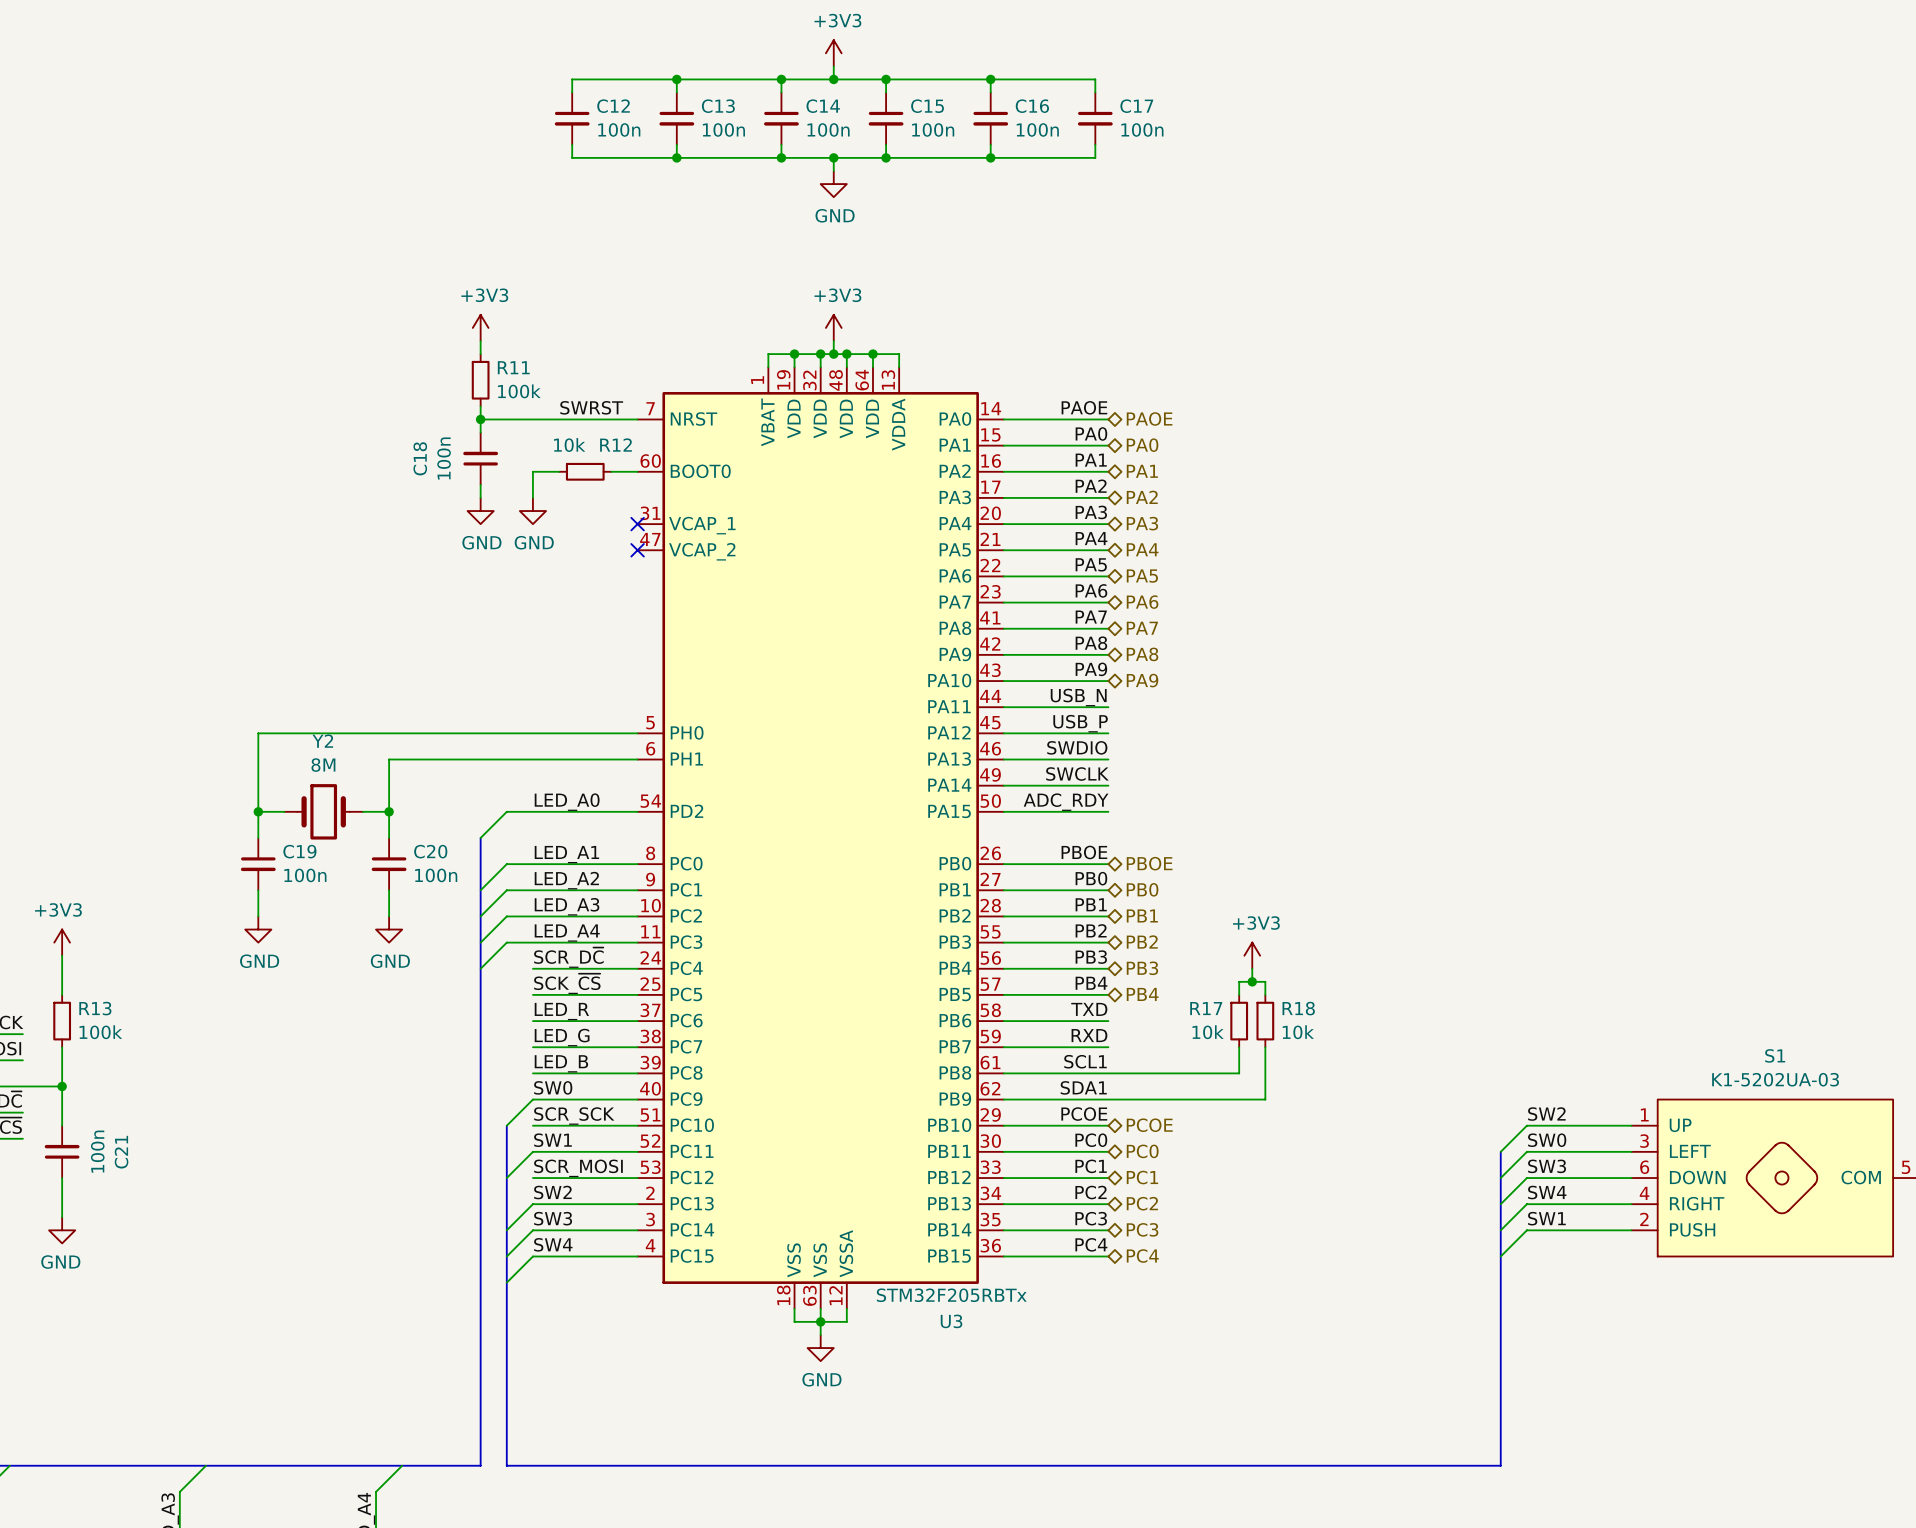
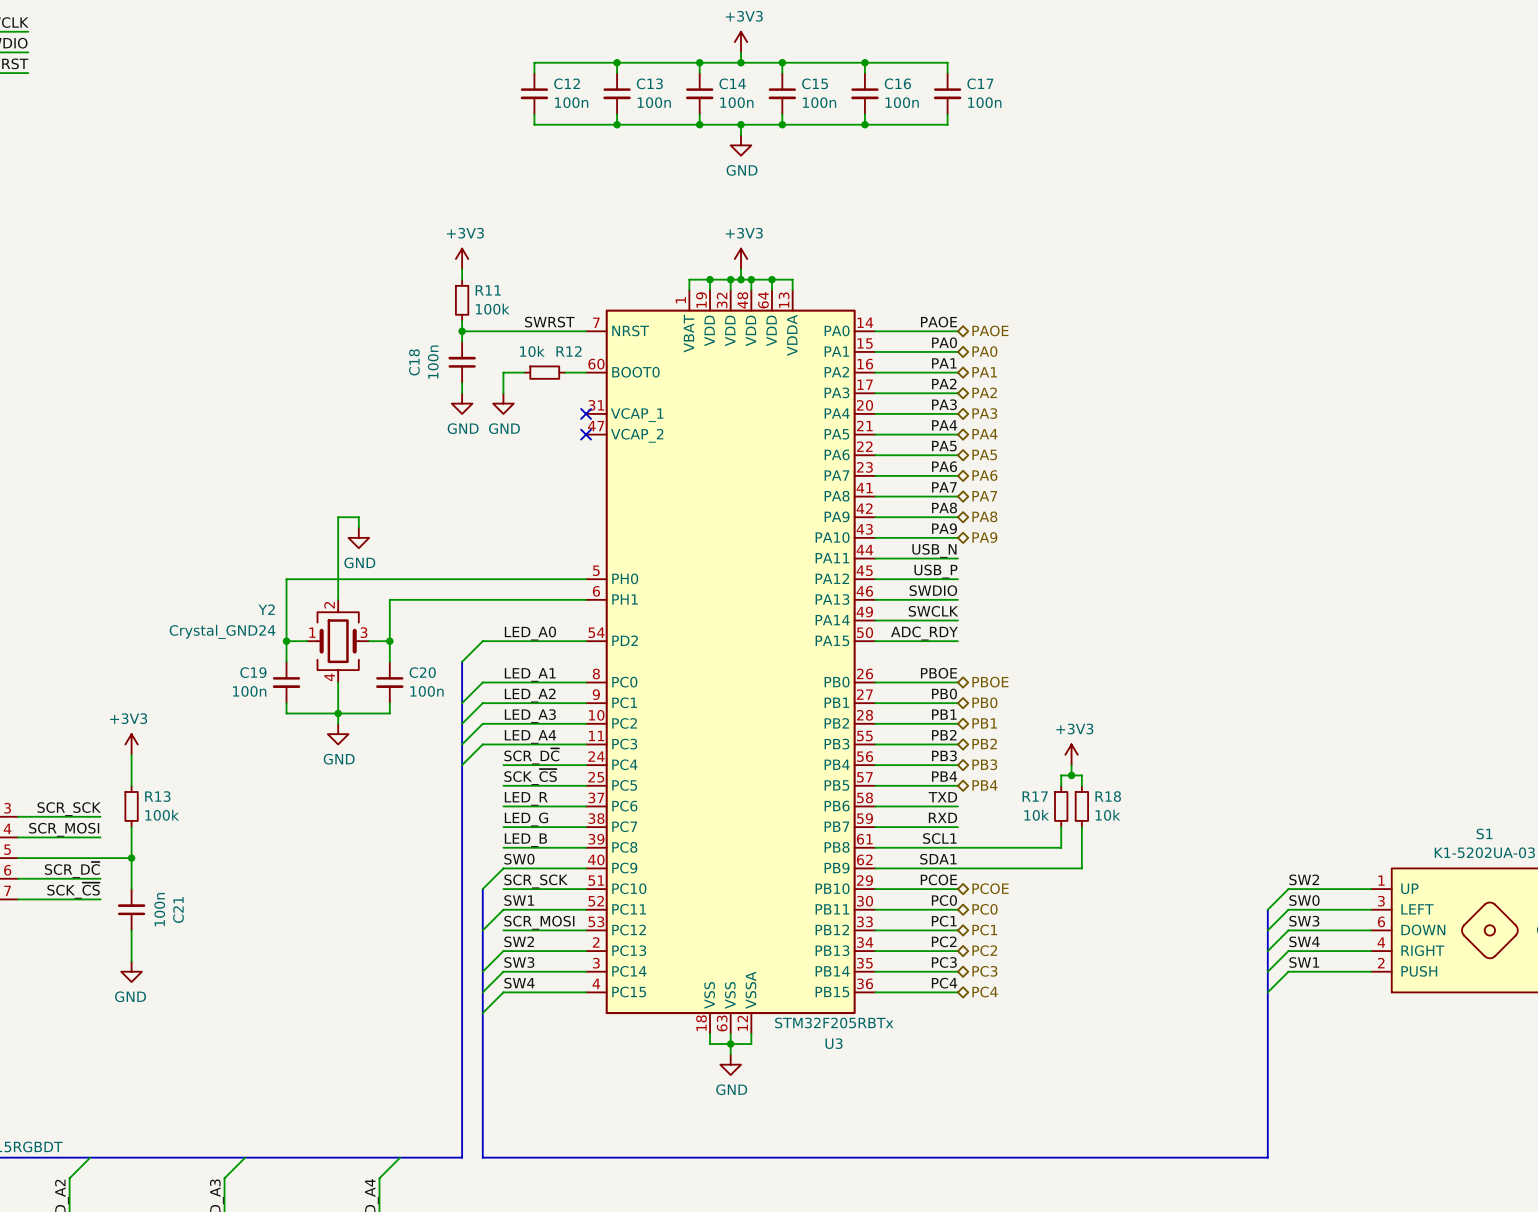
wire: none -> (358, 527) (358, 517) (338, 517) (338, 599)
power symbol: none -> GND (358, 537)
Y2 name position: Y2 (322, 741) -> Y2 (266, 609)
Y2 value: 8M (323, 765) -> Crystal_GND24 (222, 631)
Y2 symbol: [284, 784, 363, 840] -> [307, 599, 370, 683]
C19 name position: C19 (299, 851) -> C19 (253, 672)
wire: none -> (338, 682) (338, 723)
C19 value position: 100n (305, 875) -> 100n (249, 691)
wire: (258, 903) (258, 916) -> (286, 713) (389, 713)
junction: none -> (338, 713)
wire: (389, 903) (389, 916) -> none
power symbol: GND (258, 929) -> none
power symbol: none -> GND (338, 734)
power symbol: GND (389, 929) -> none

